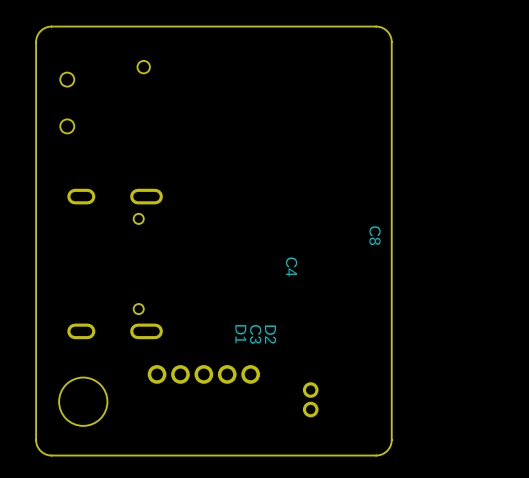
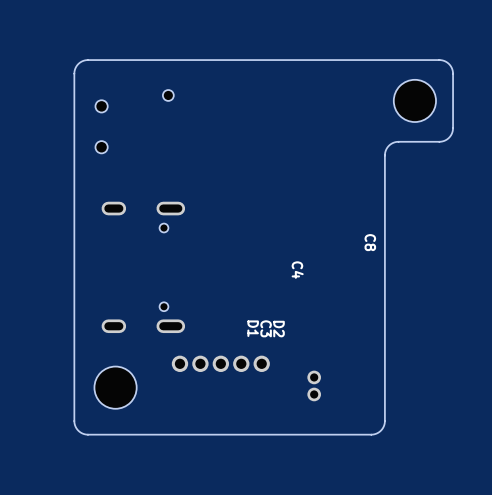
board edge: (376, 26) (387, 31) (391, 40) (391, 135) -> (371, 60) (440, 60) (449, 64) (452, 72) (453, 128) (450, 136) (440, 141) (395, 142) (387, 146) (384, 155)
part: none -> (414, 100)

